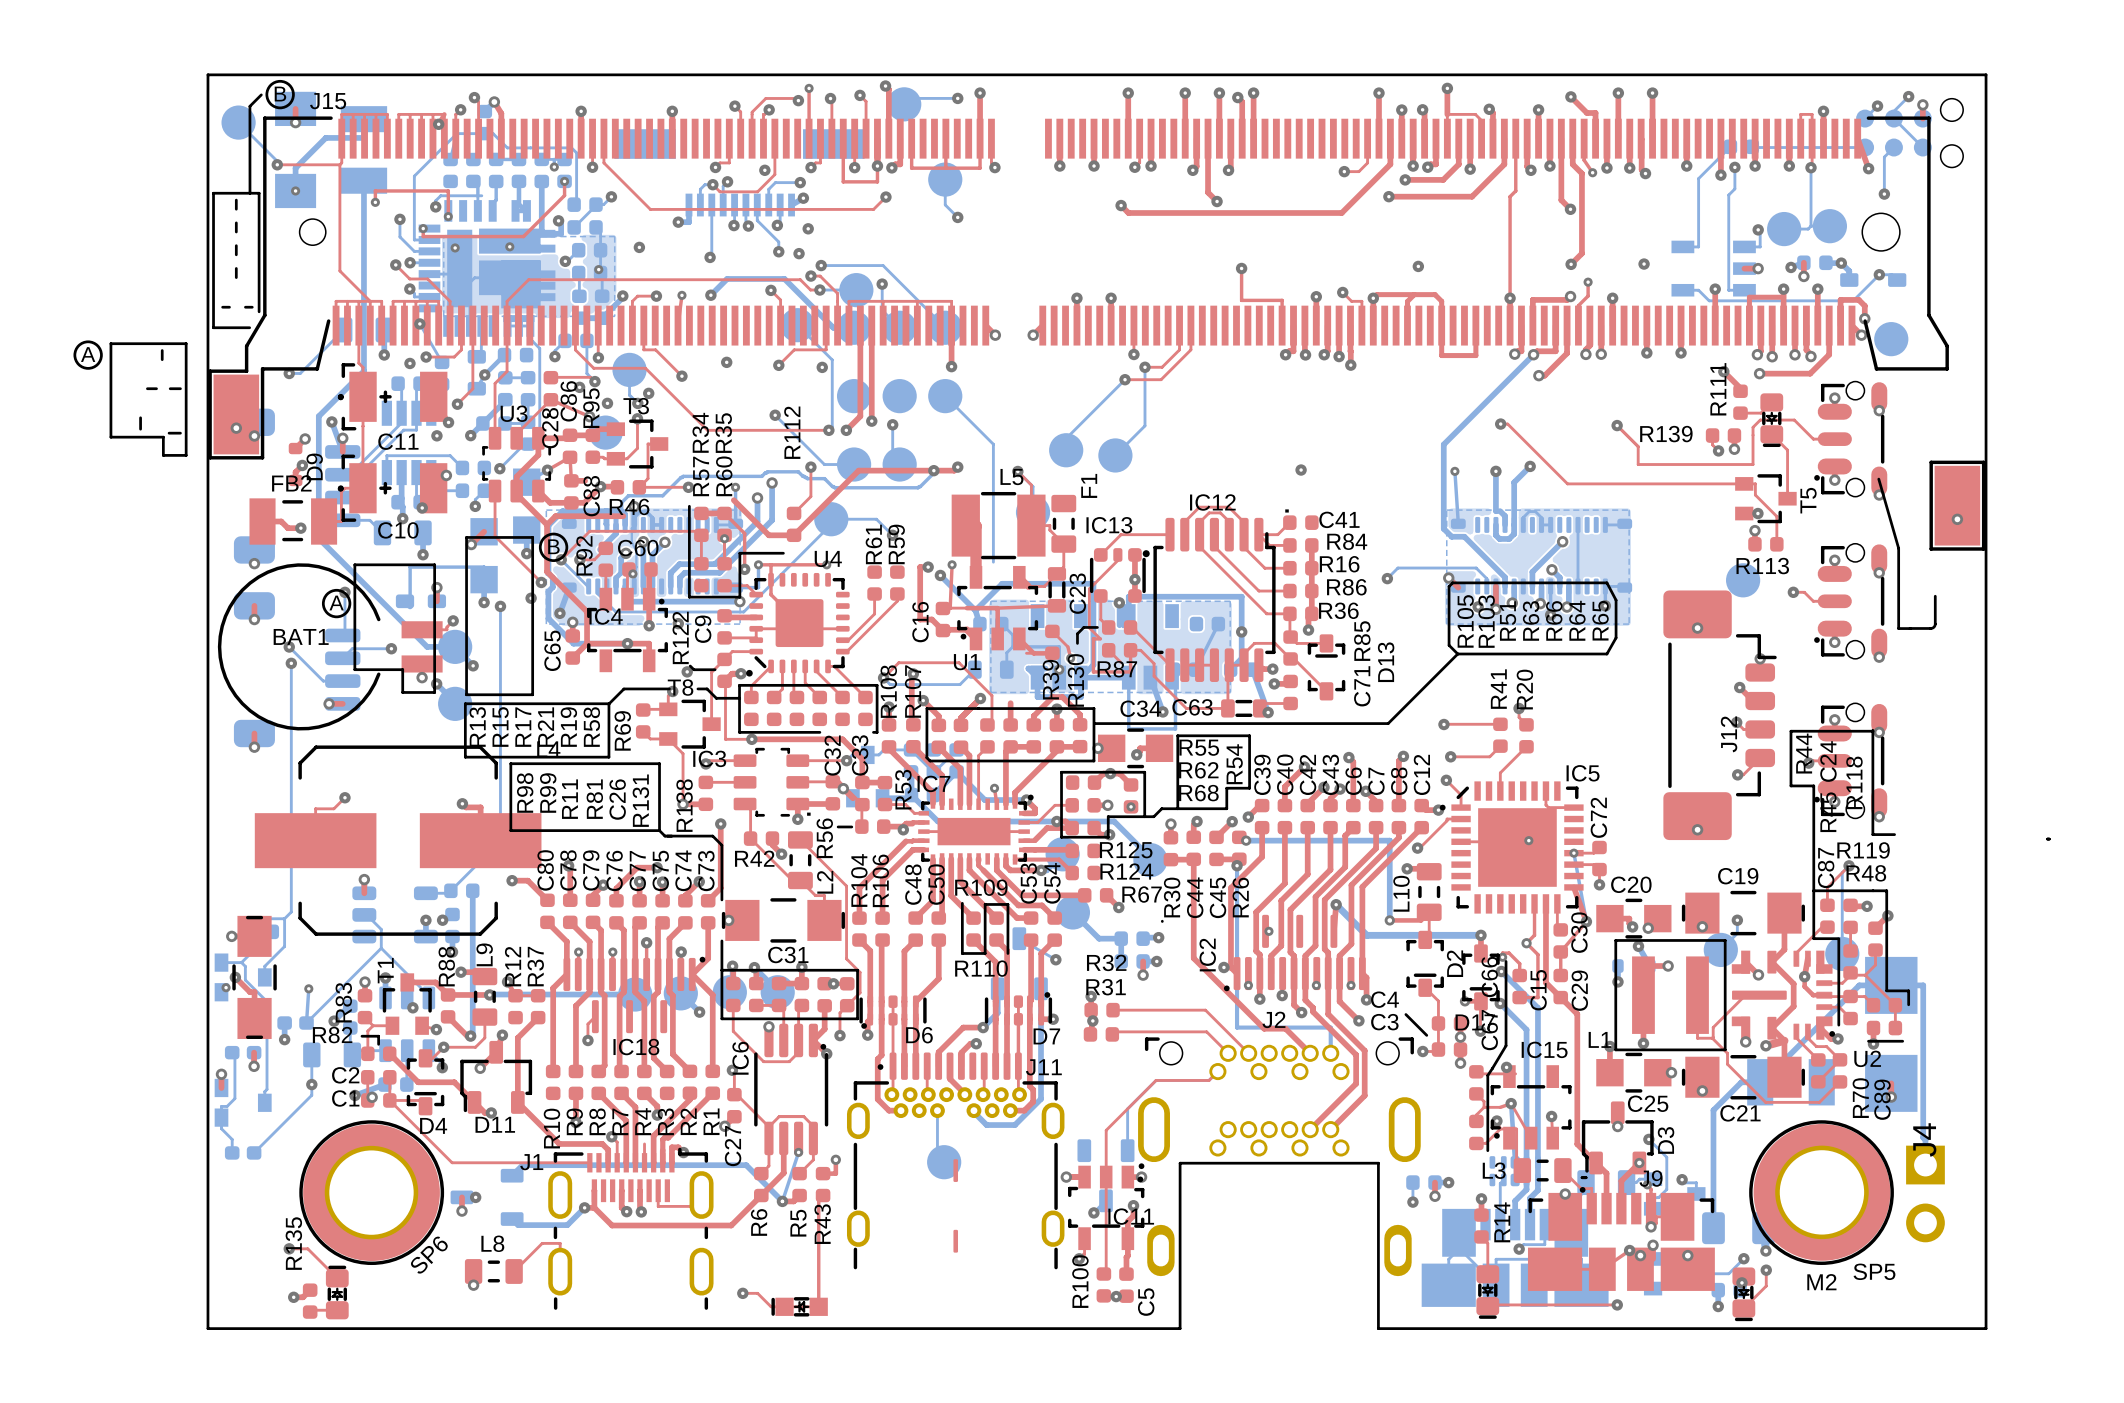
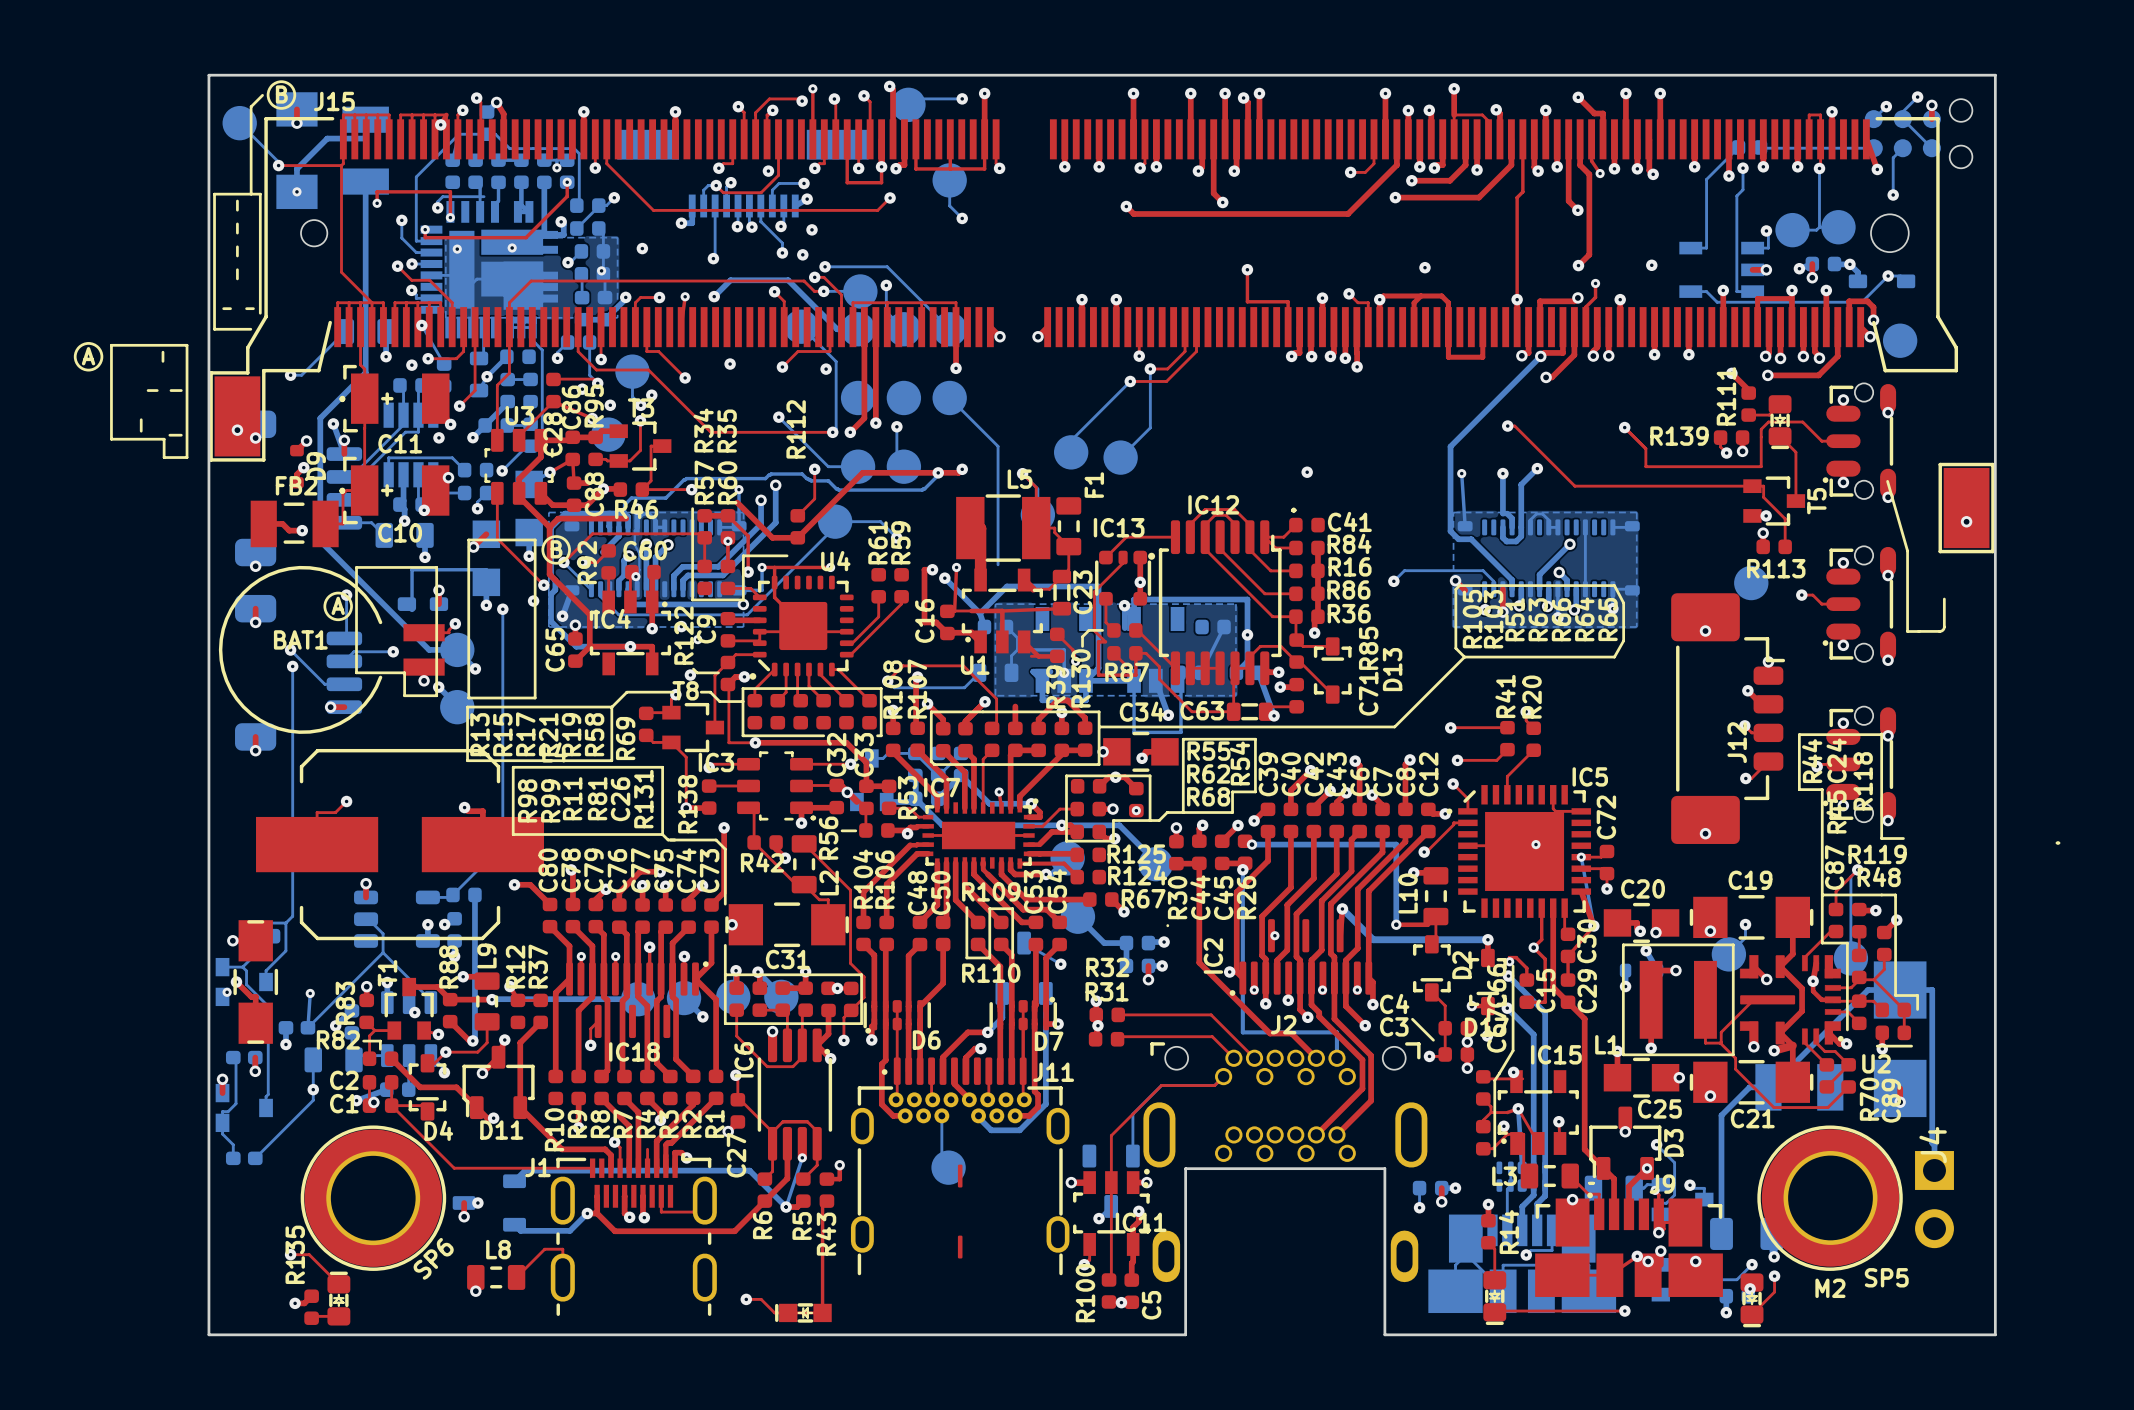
via: none -> (697, 639)

